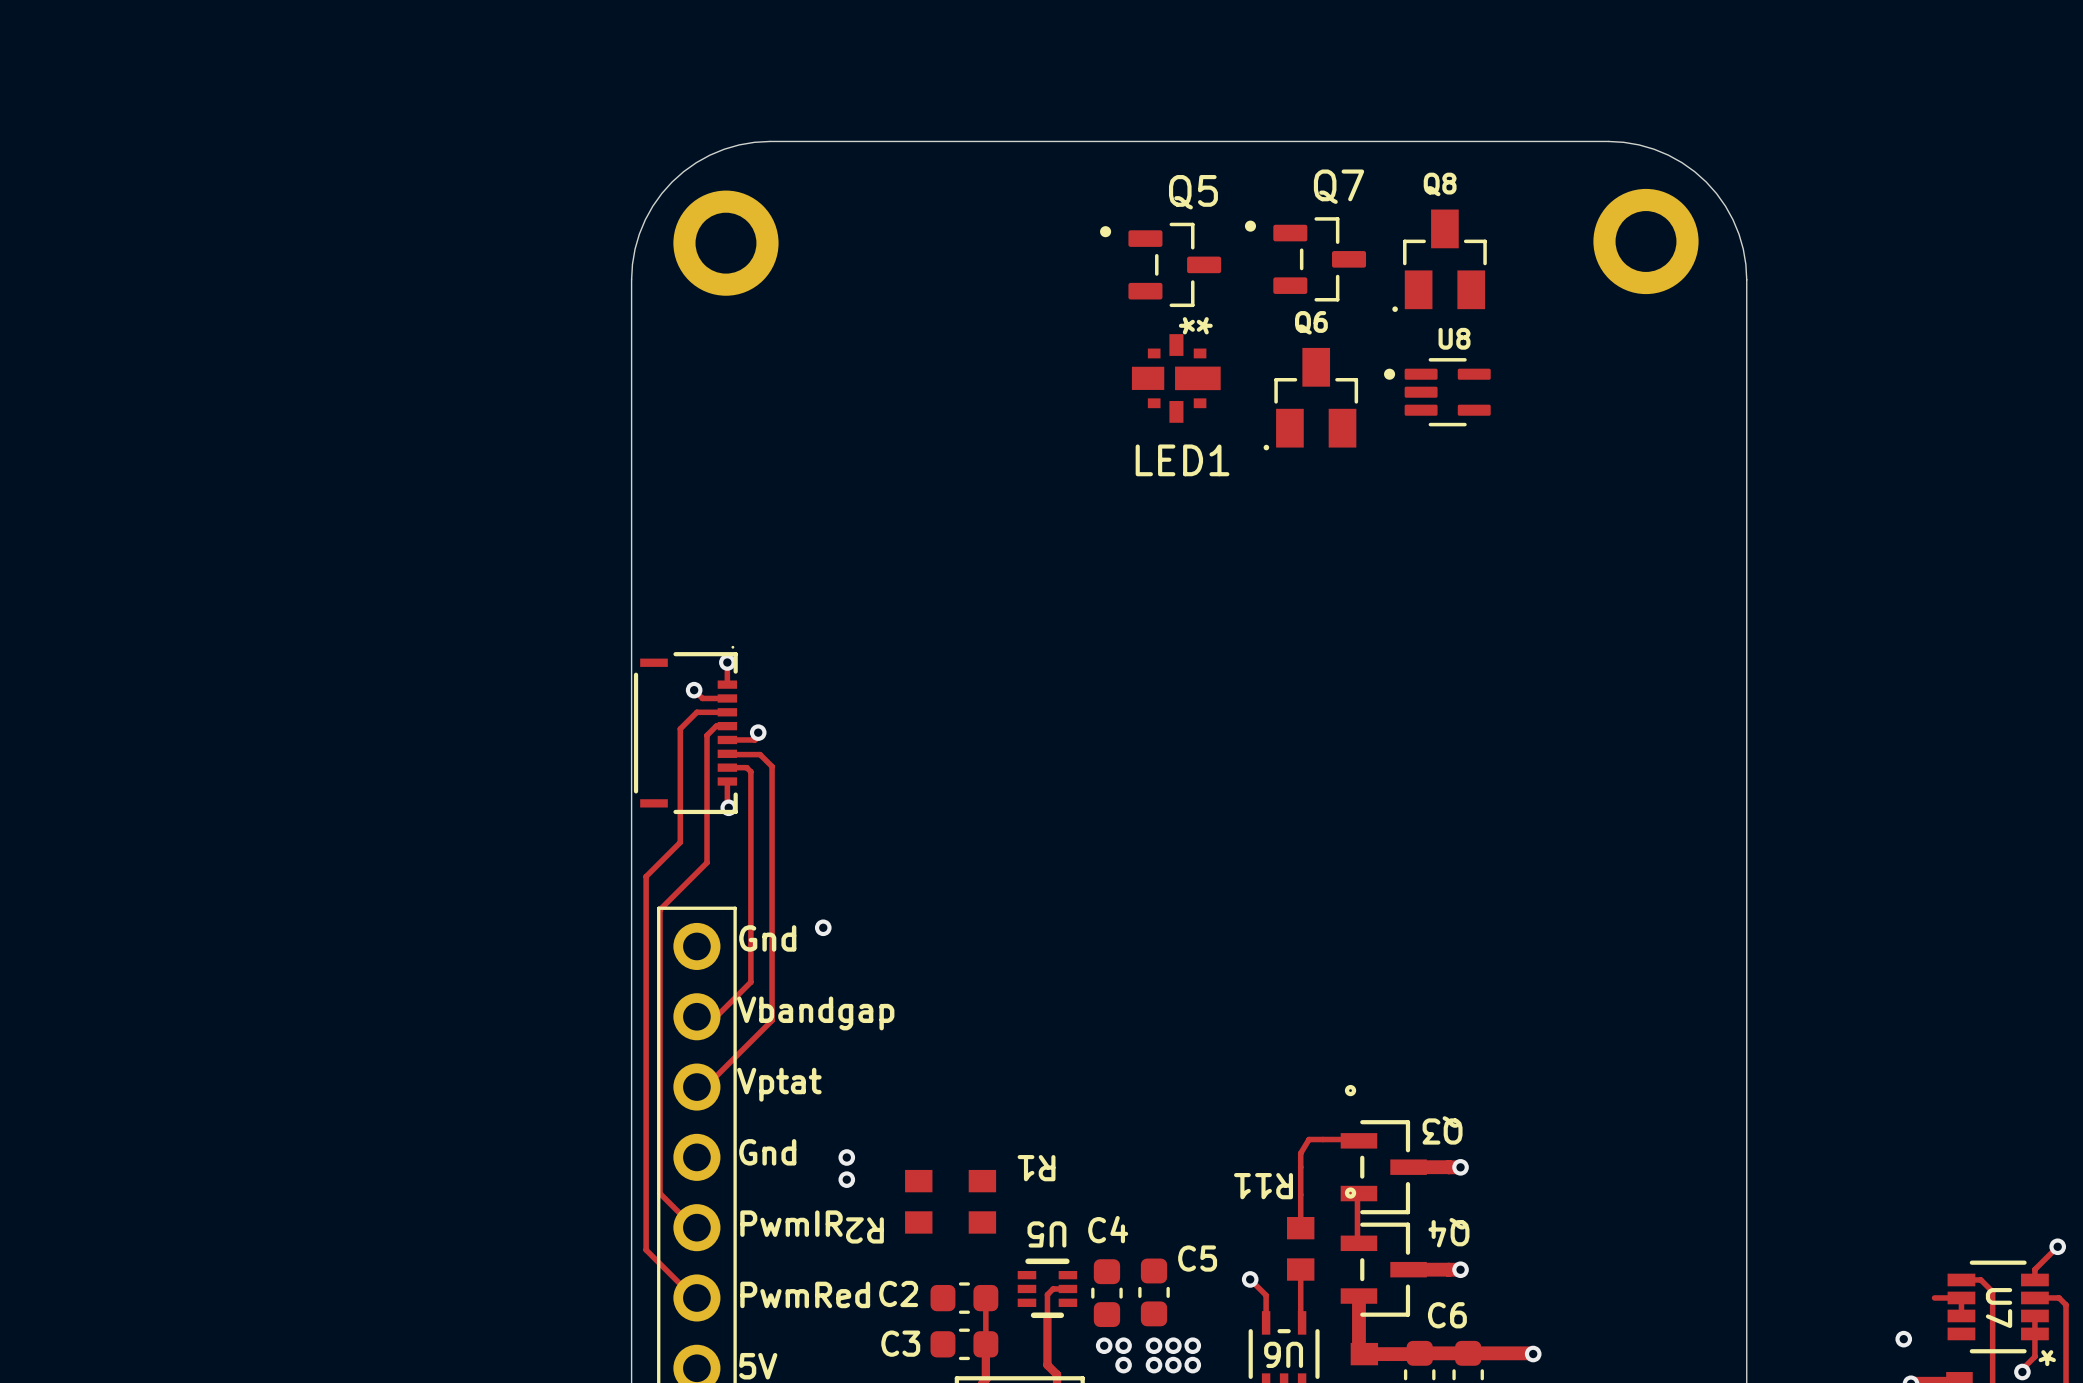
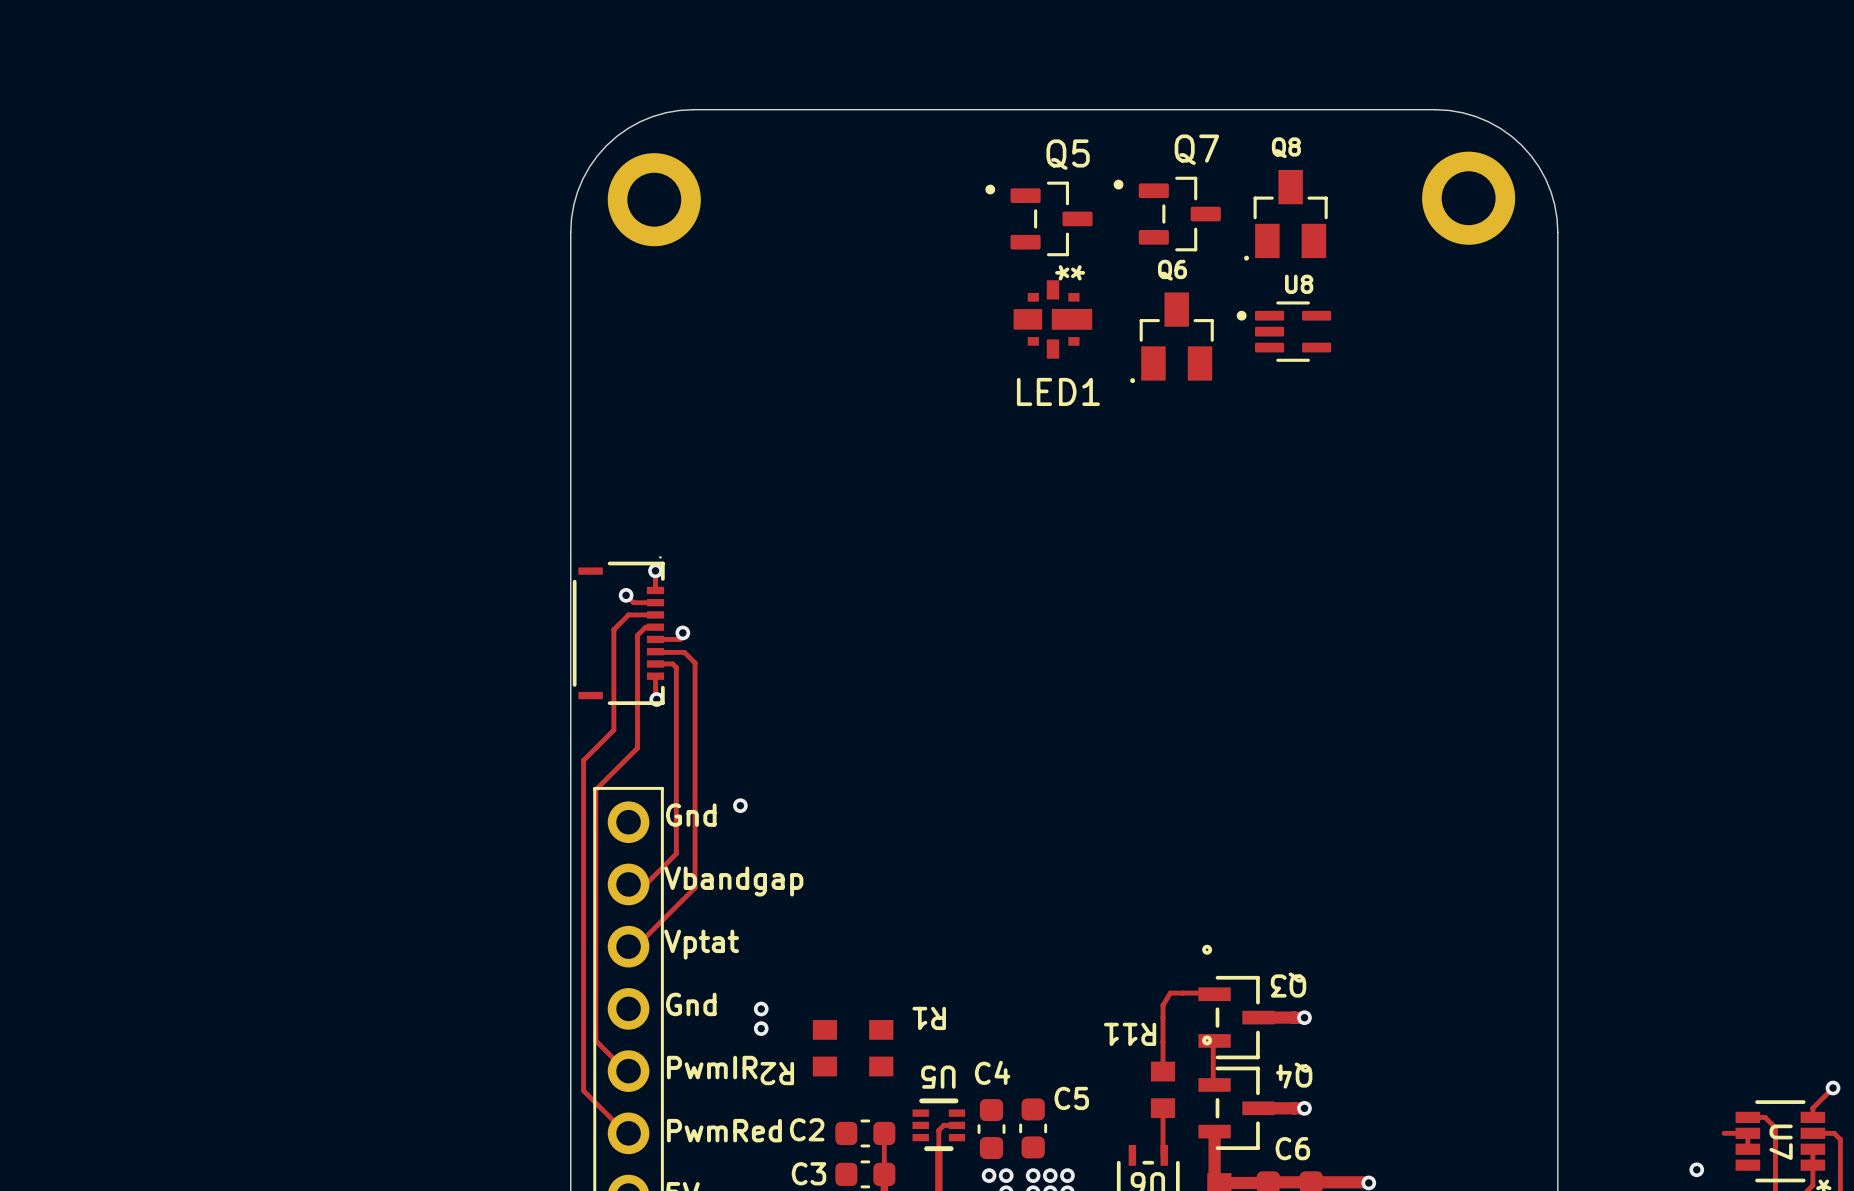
track: (1250, 1279) (1266, 1295) (1266, 1322) -> none
via: (1250, 1279) -> none

